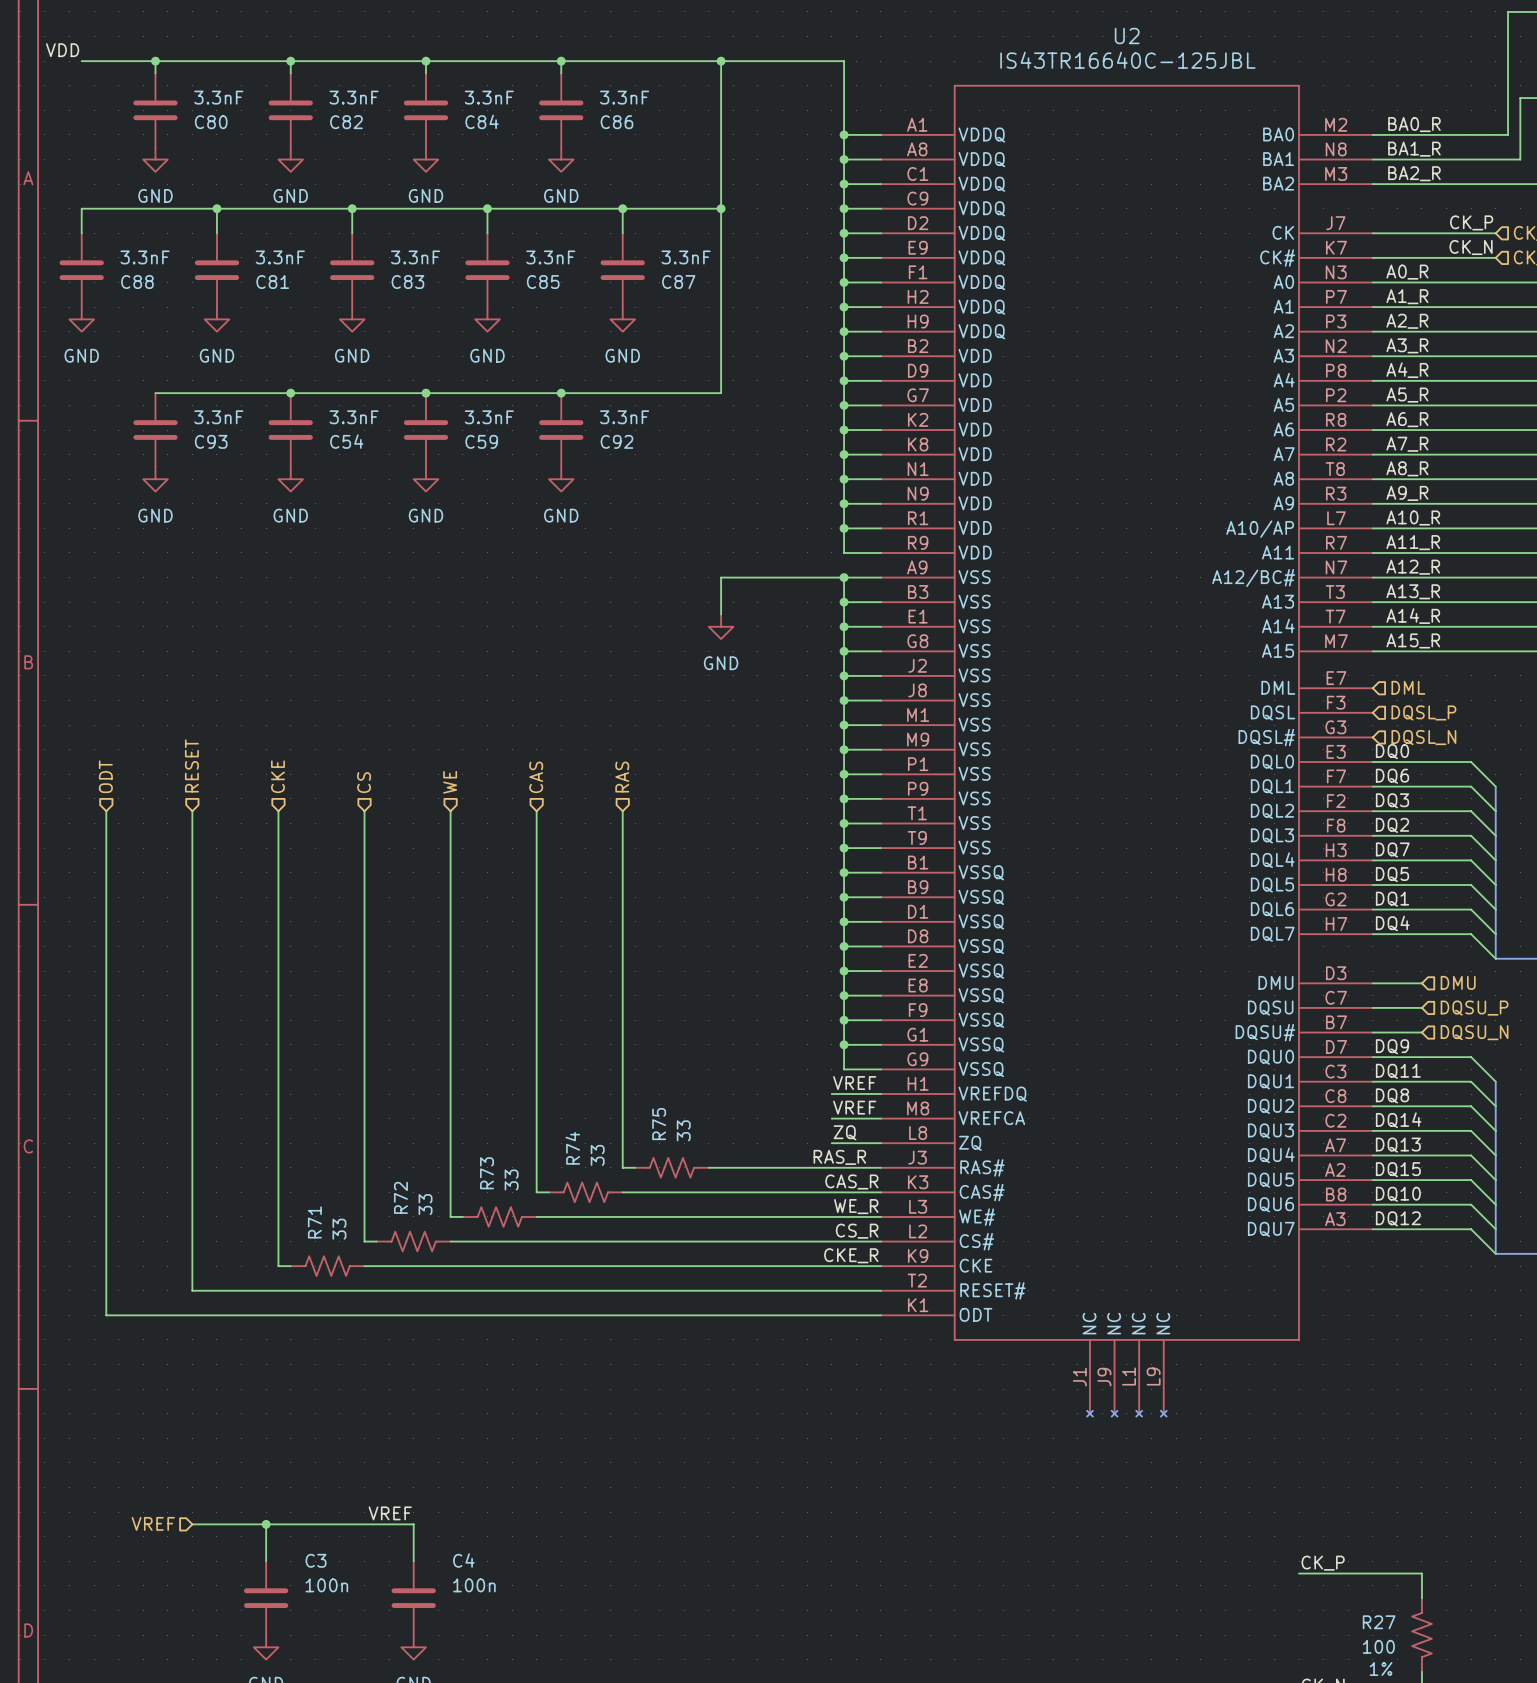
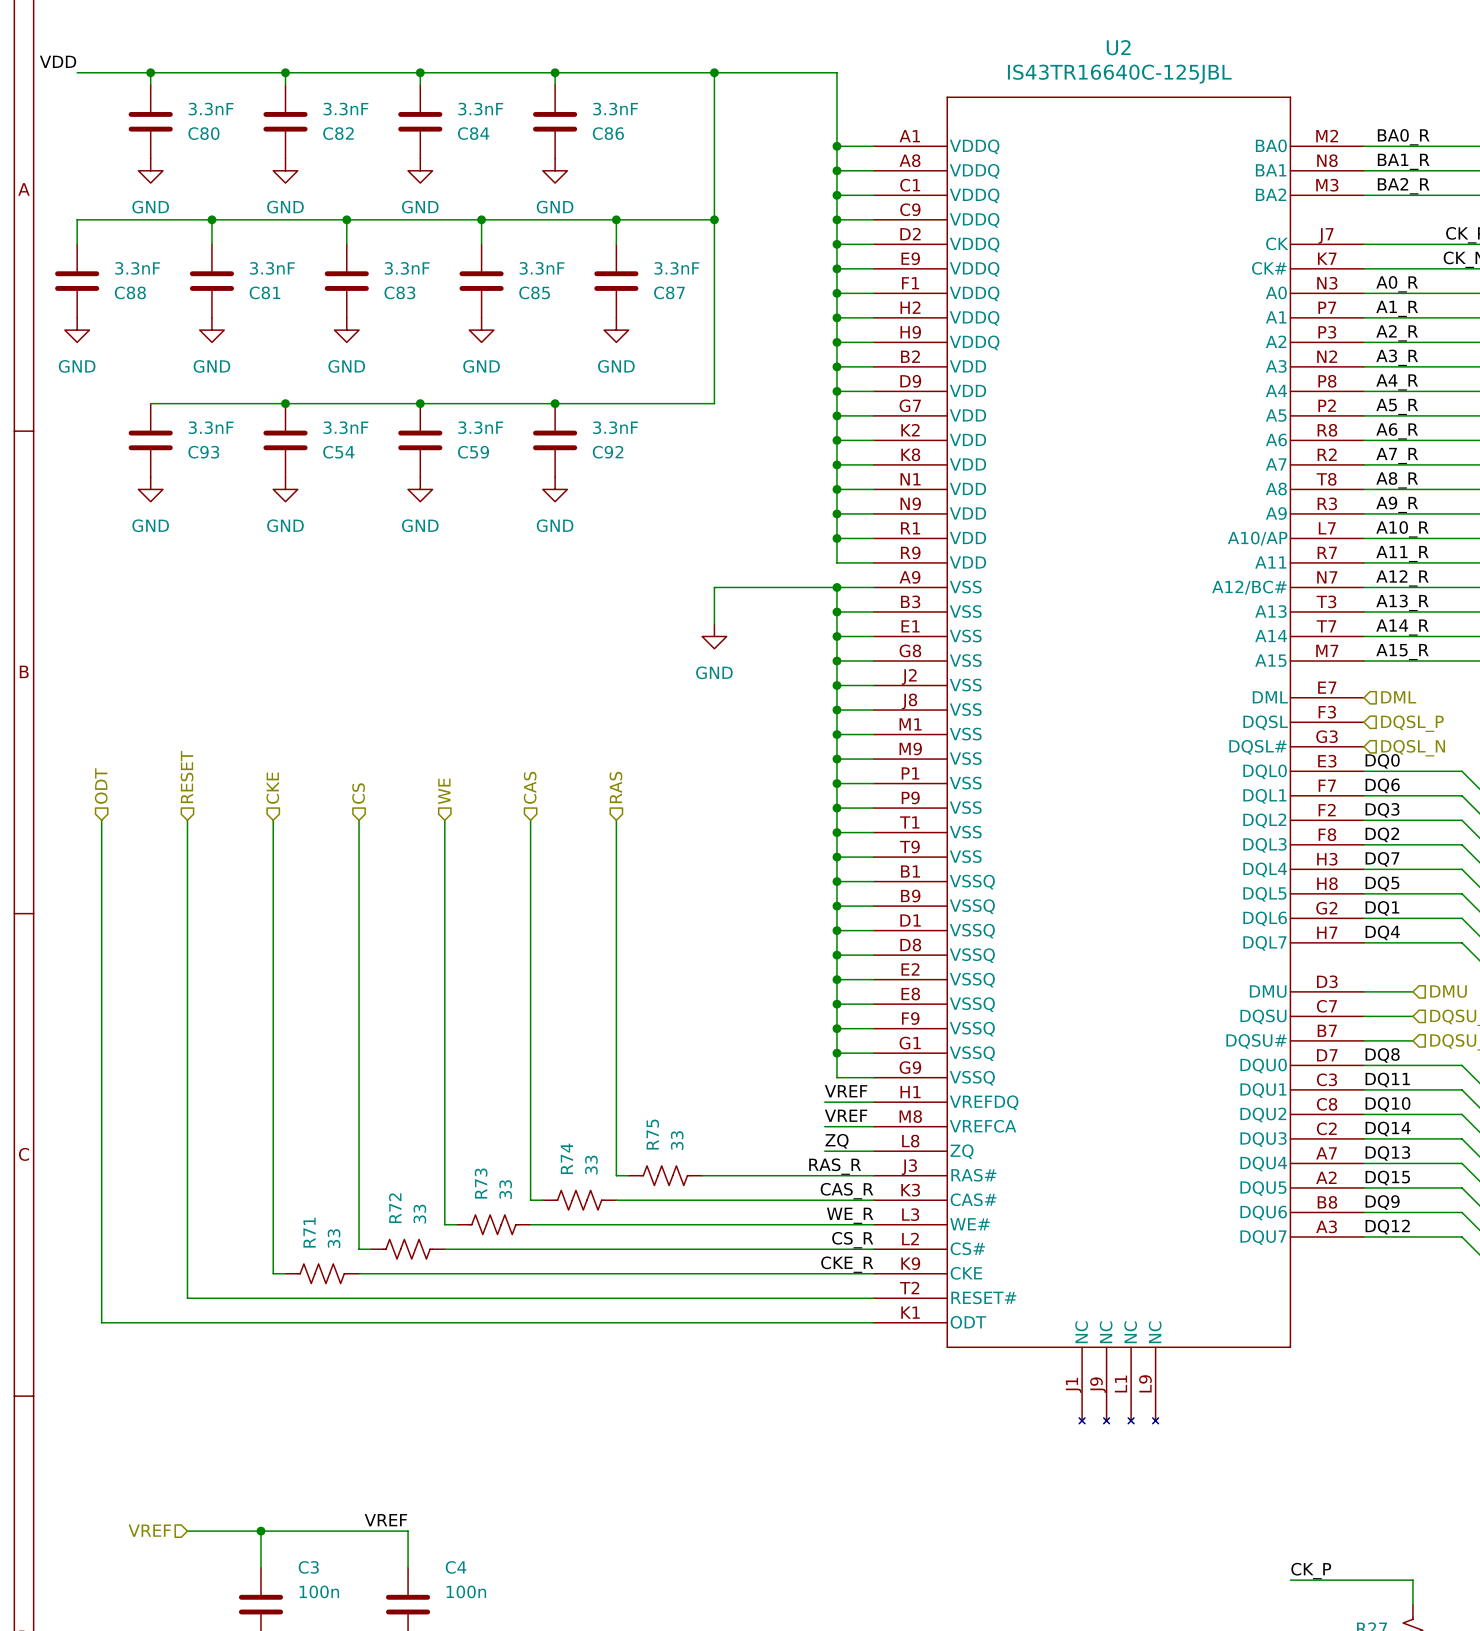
label: DQ9 (1392, 1046) -> DQ8 (1382, 1055)
label: DQ8 (1392, 1095) -> DQ10 (1387, 1104)
label: DQ10 (1398, 1194) -> DQ9 (1382, 1202)

